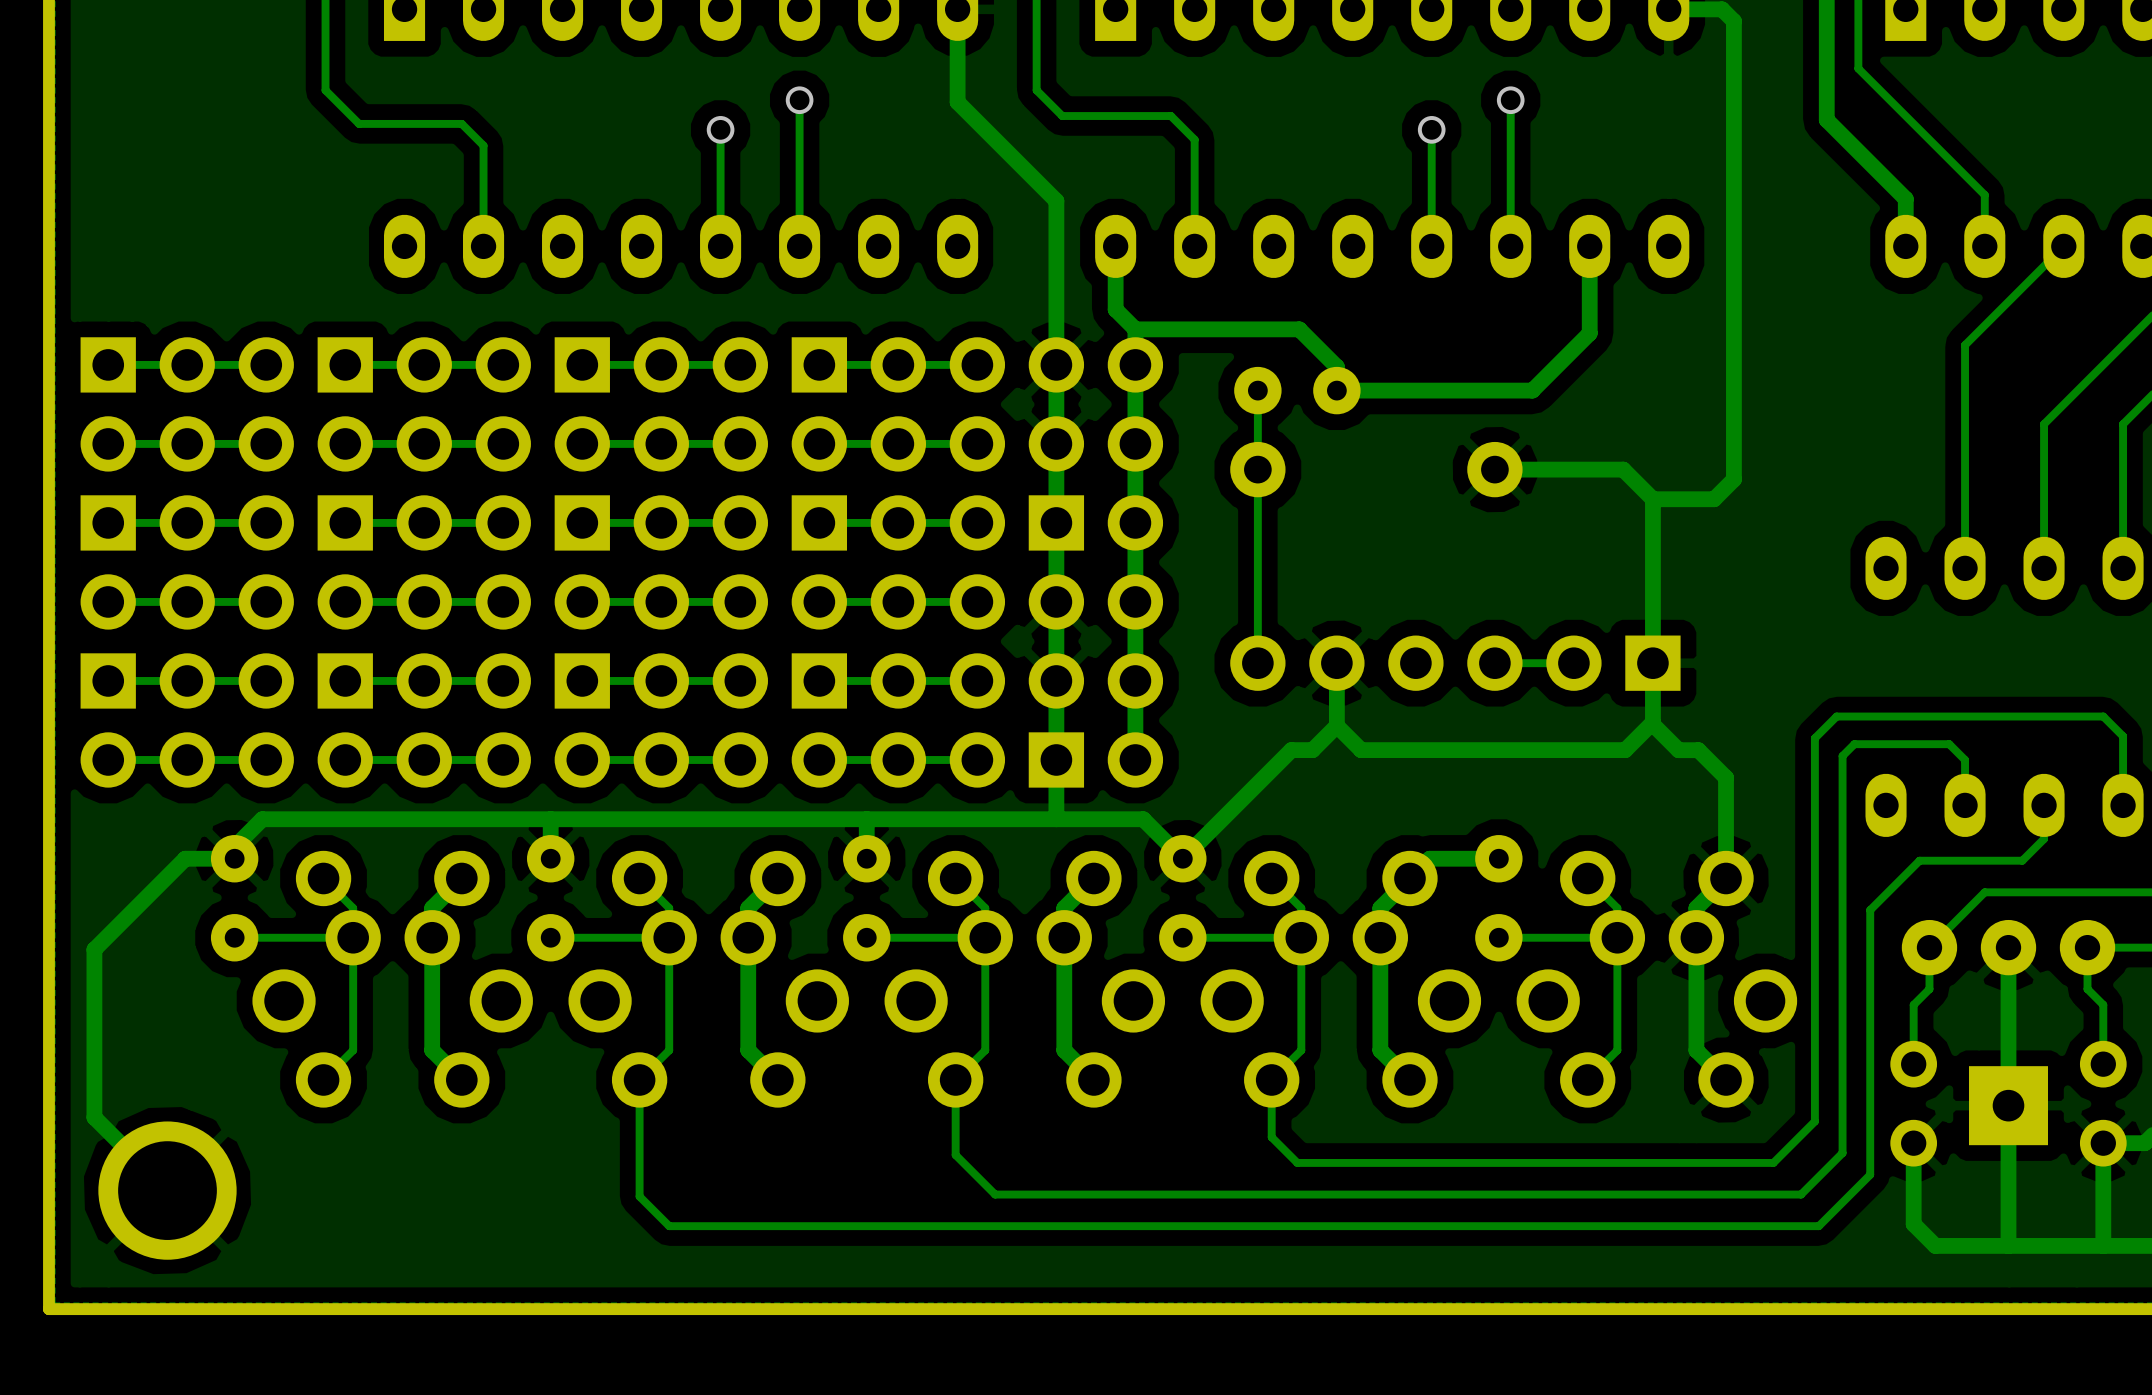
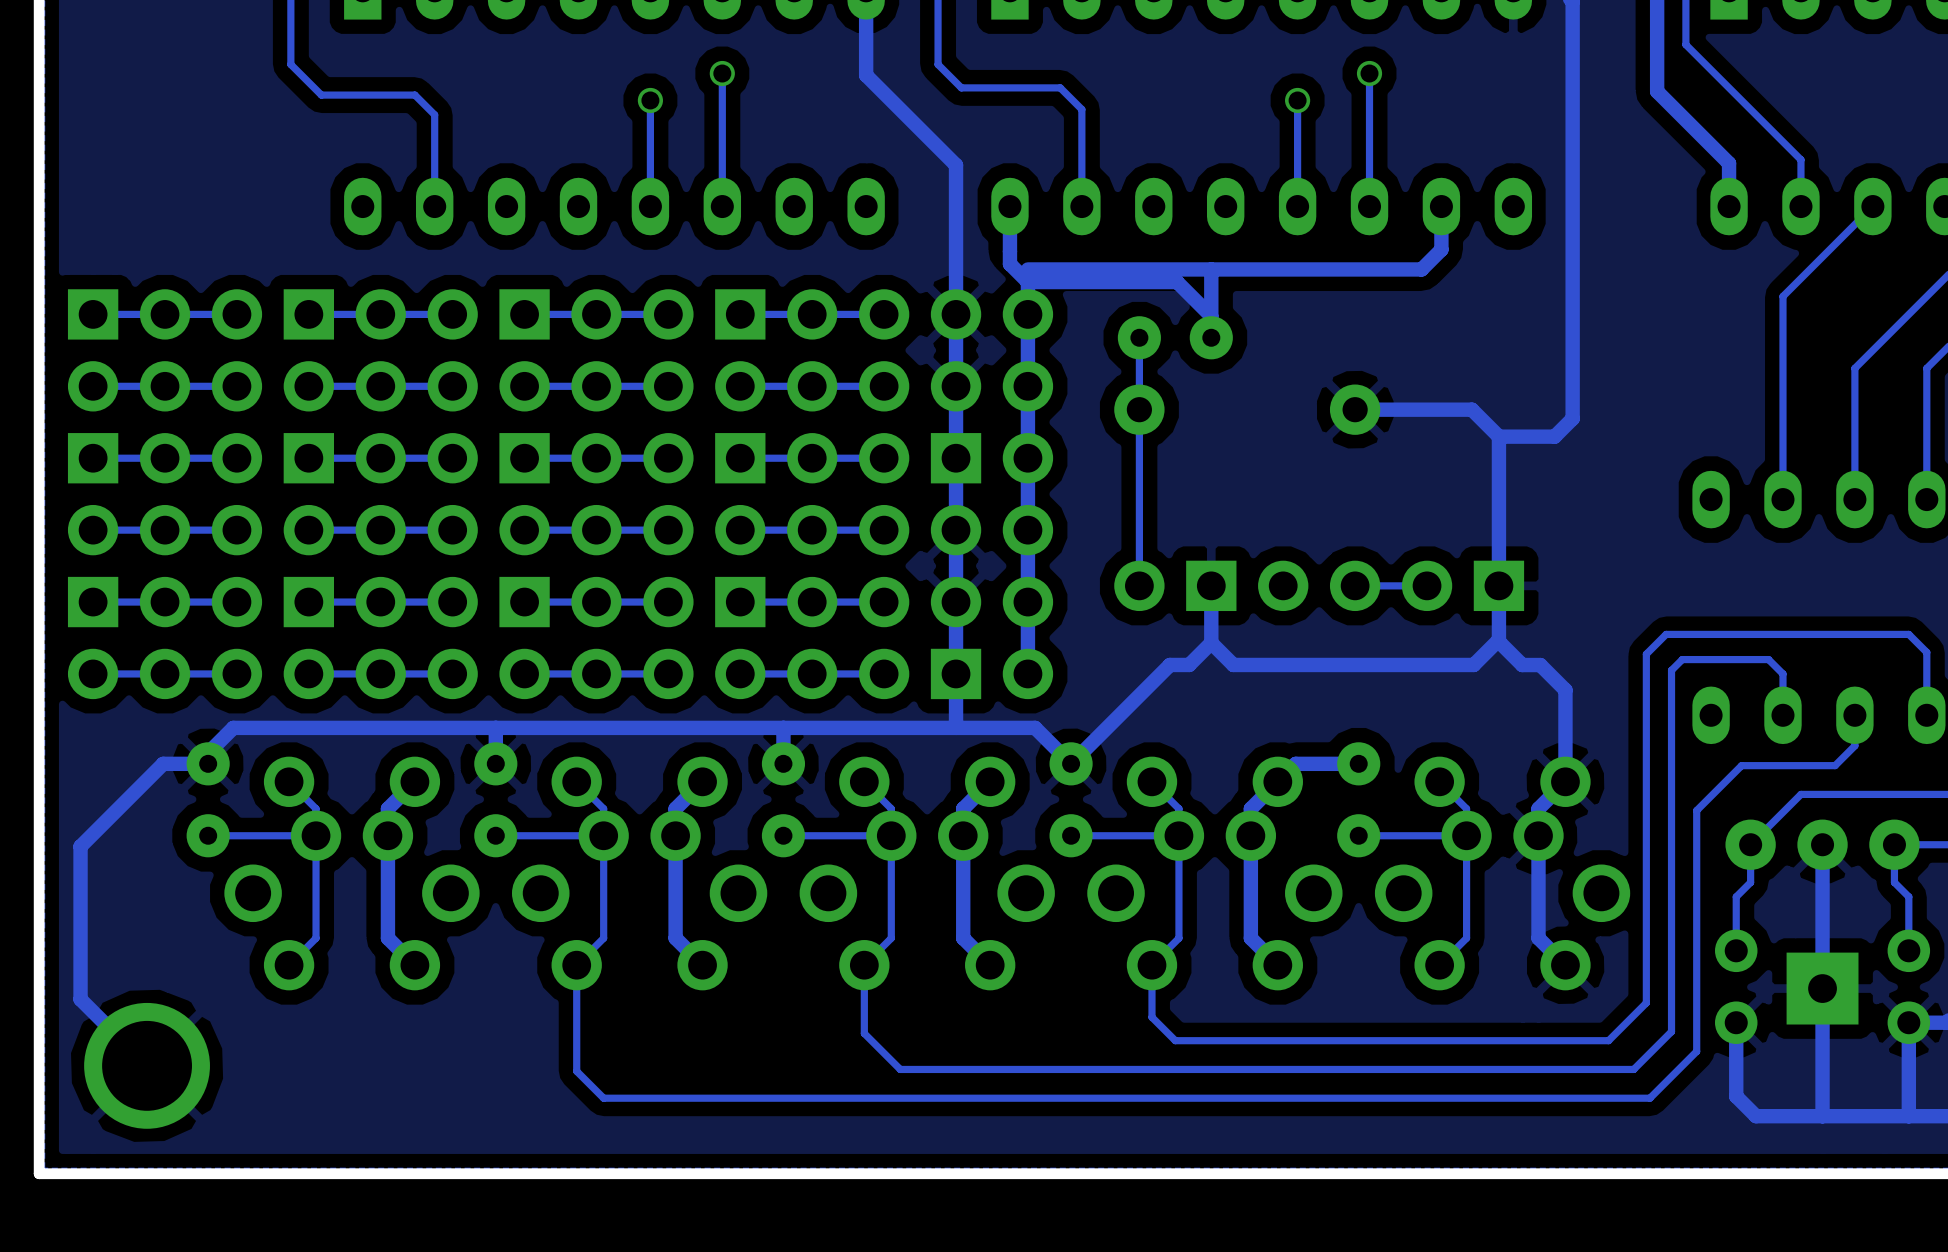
track: (1589, 293) (1589, 333) (1532, 390) (1336, 390) -> (1441, 249) (1421, 269) (1027, 269)
track: none -> (1211, 269) (1211, 316)
part footprint: [1230, 635, 1681, 691] -> [1114, 560, 1525, 612]

